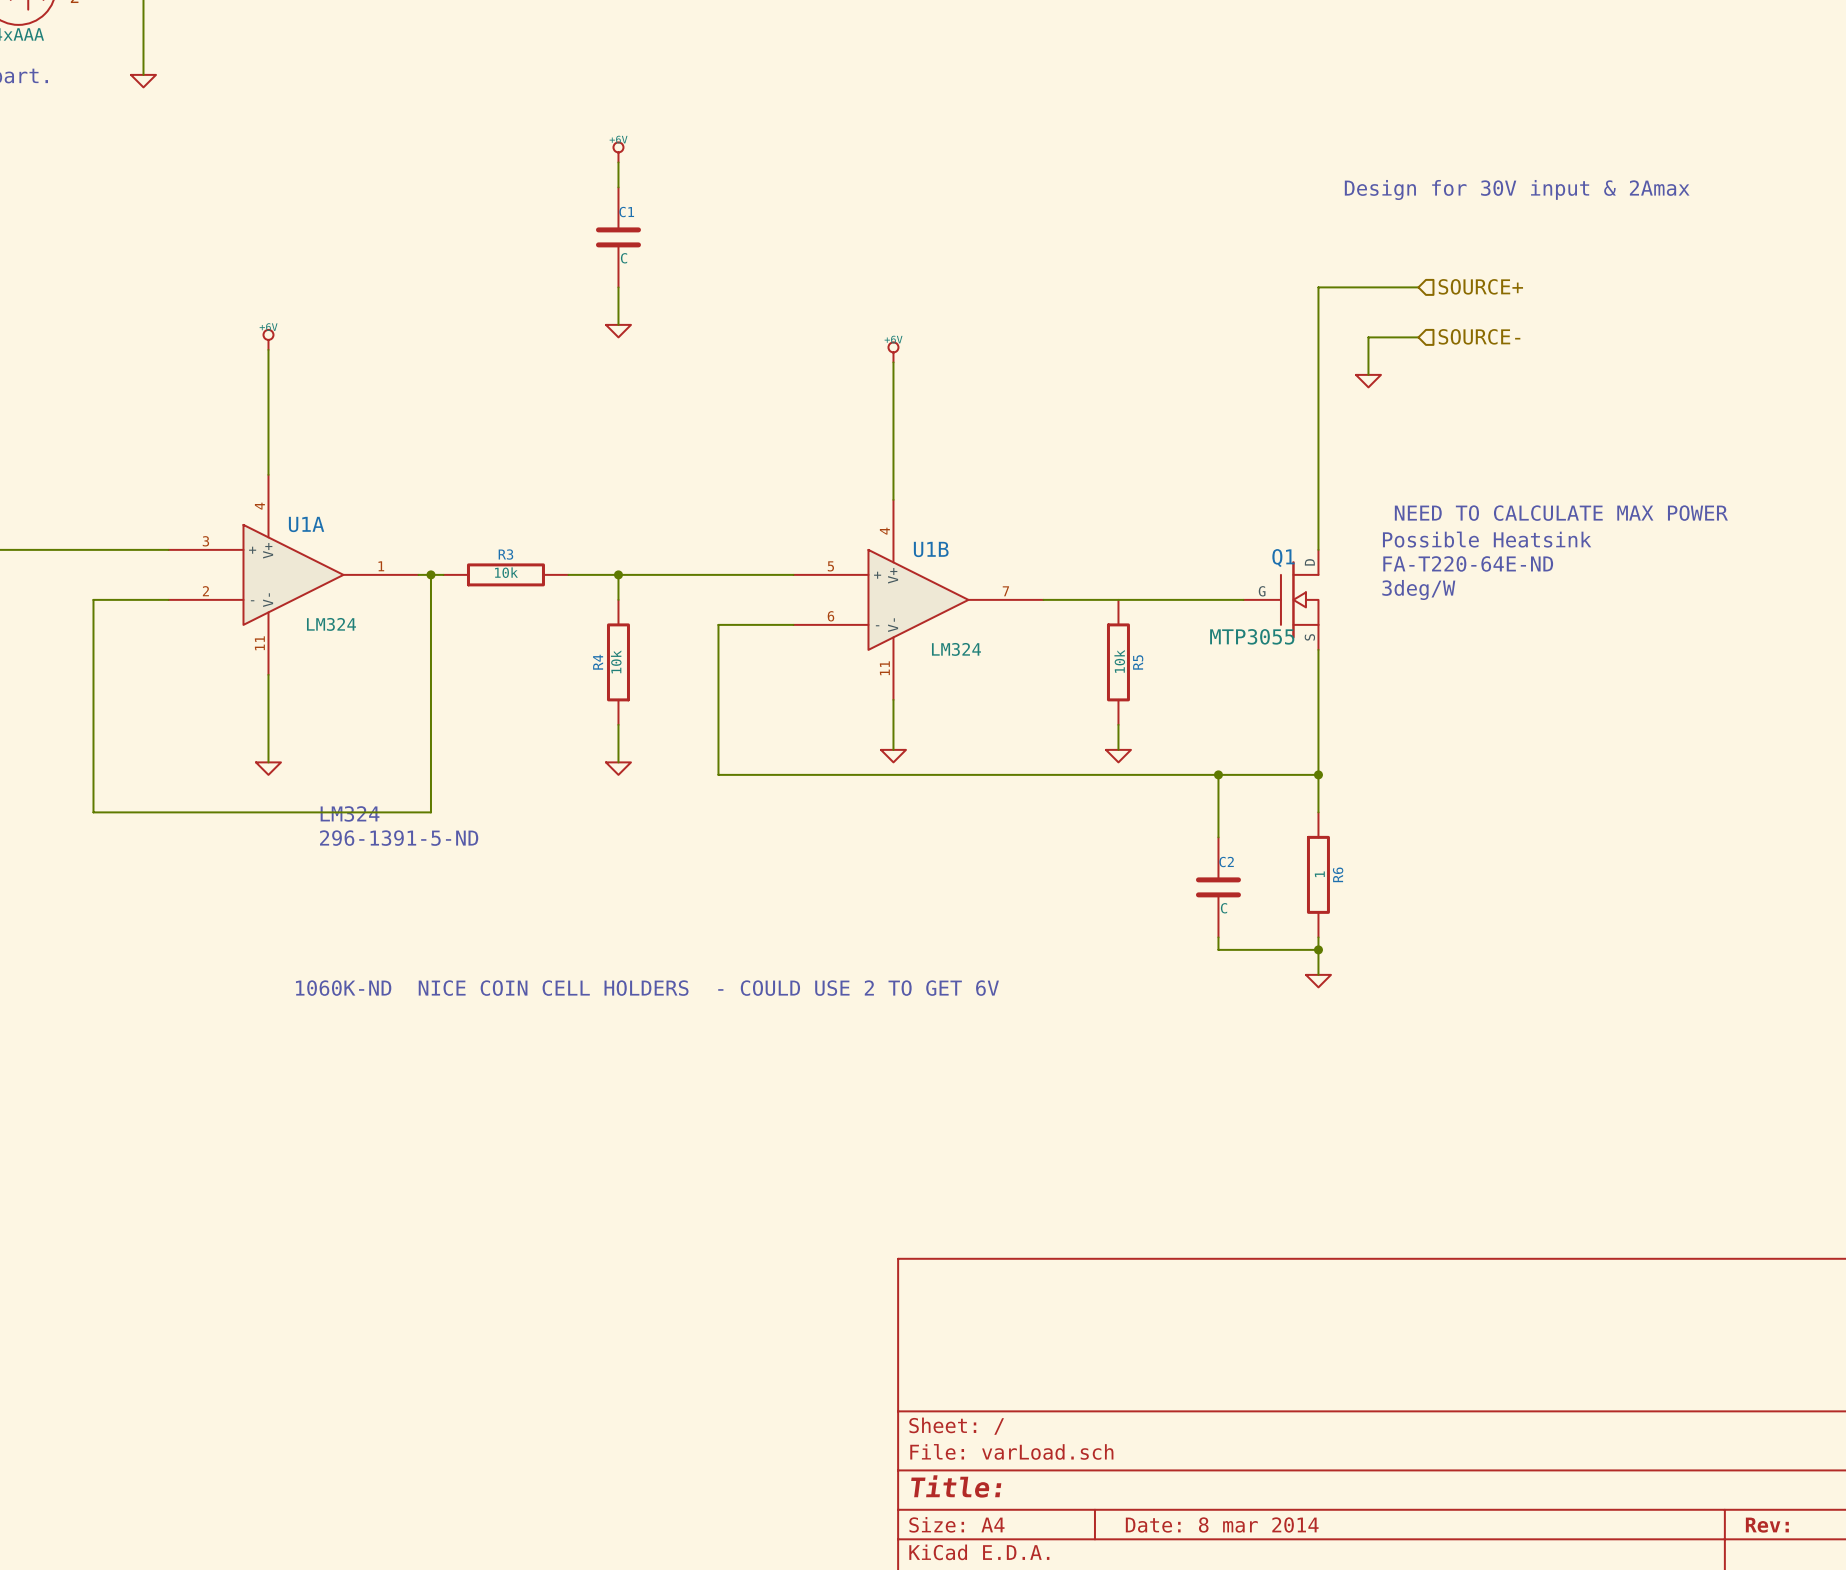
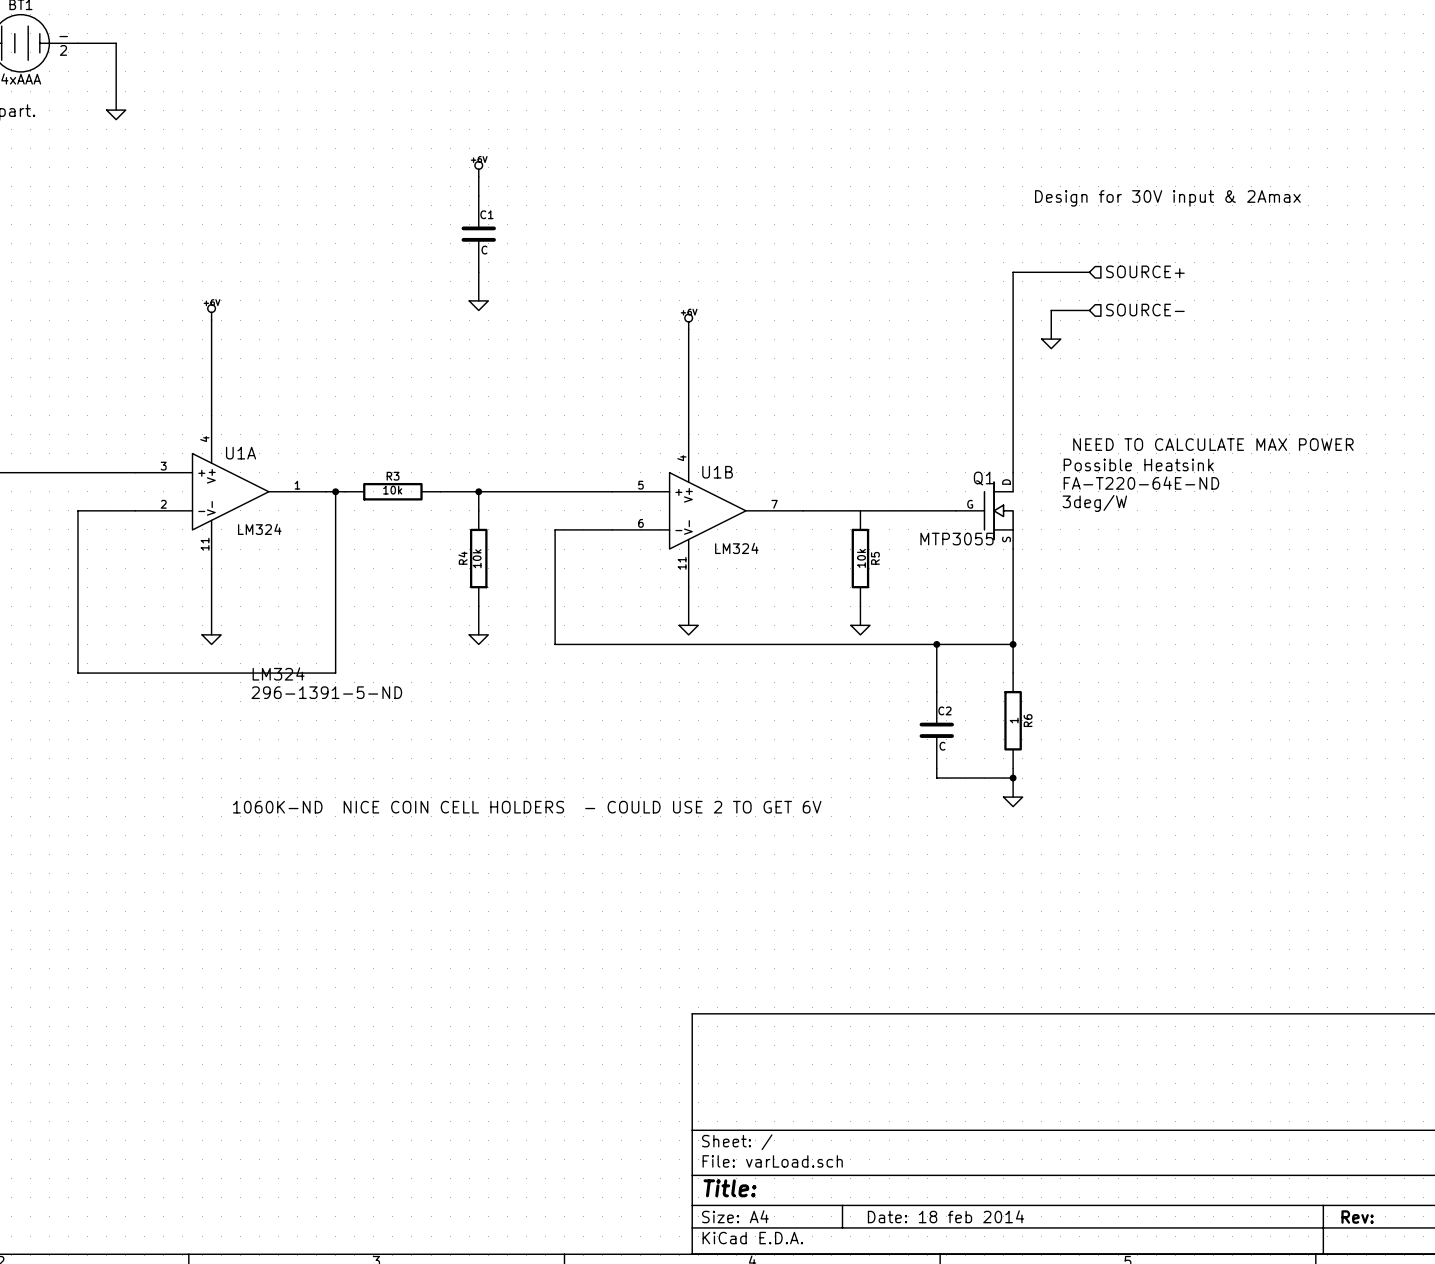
title block: Date: 8 mar 2014 (1222, 1524) -> Date: 18 feb 2014 (946, 1216)

